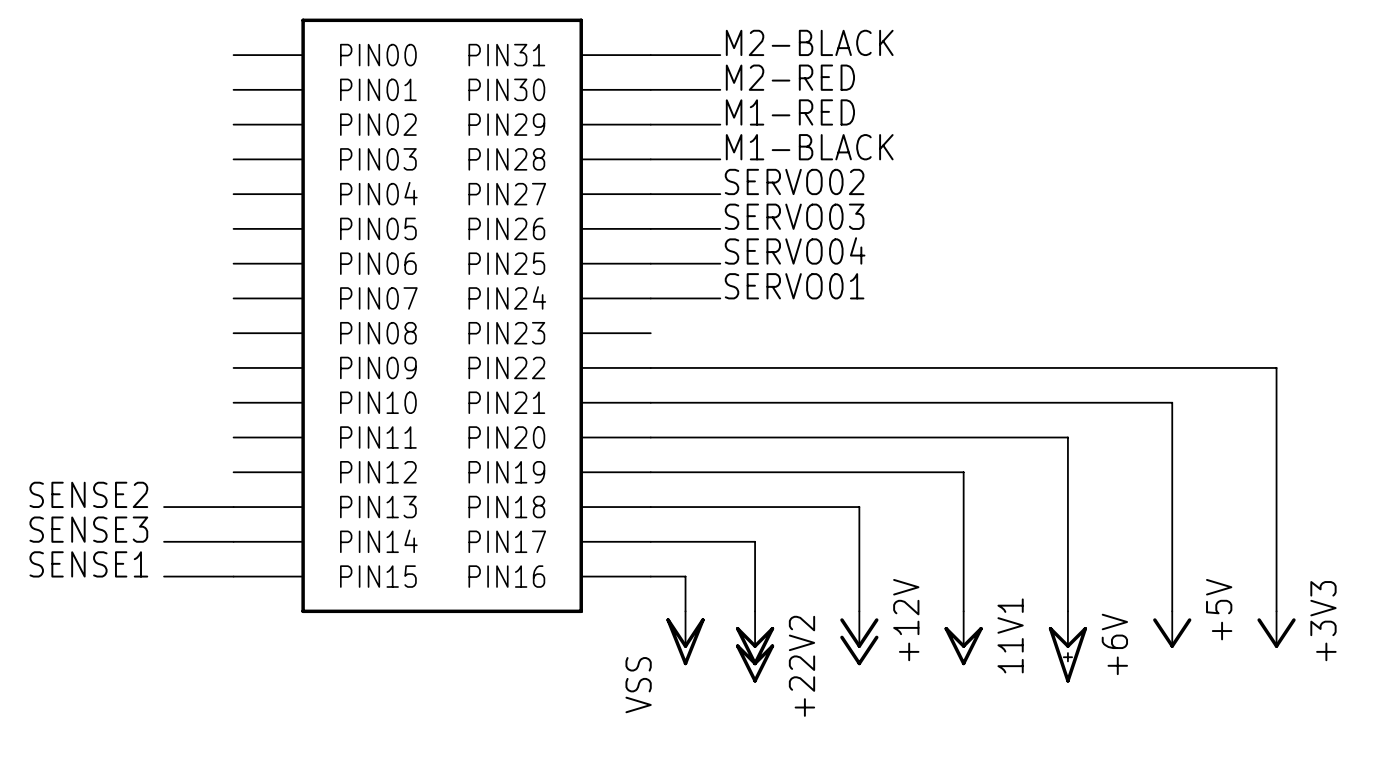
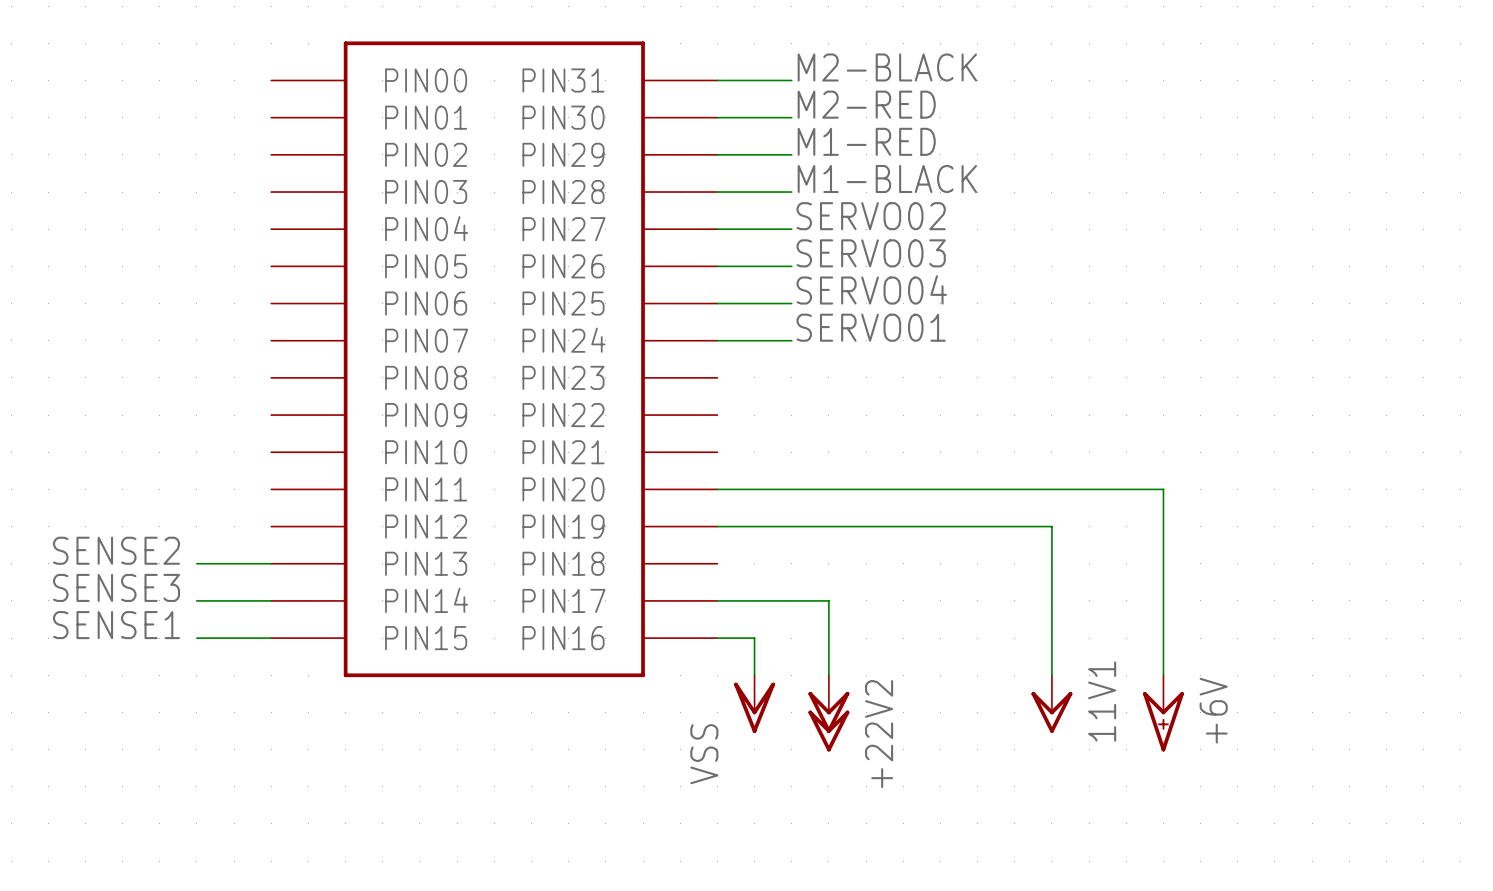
wire: (650, 367) (1276, 367) (1276, 611) -> none
wire: (650, 402) (1172, 402) (1172, 611) -> none
wire: (650, 507) (859, 507) (859, 611) -> none
power symbol: +5V (1172, 629) -> none
power symbol: +3V3 (1276, 629) -> none
power symbol: +12V (859, 638) -> none

